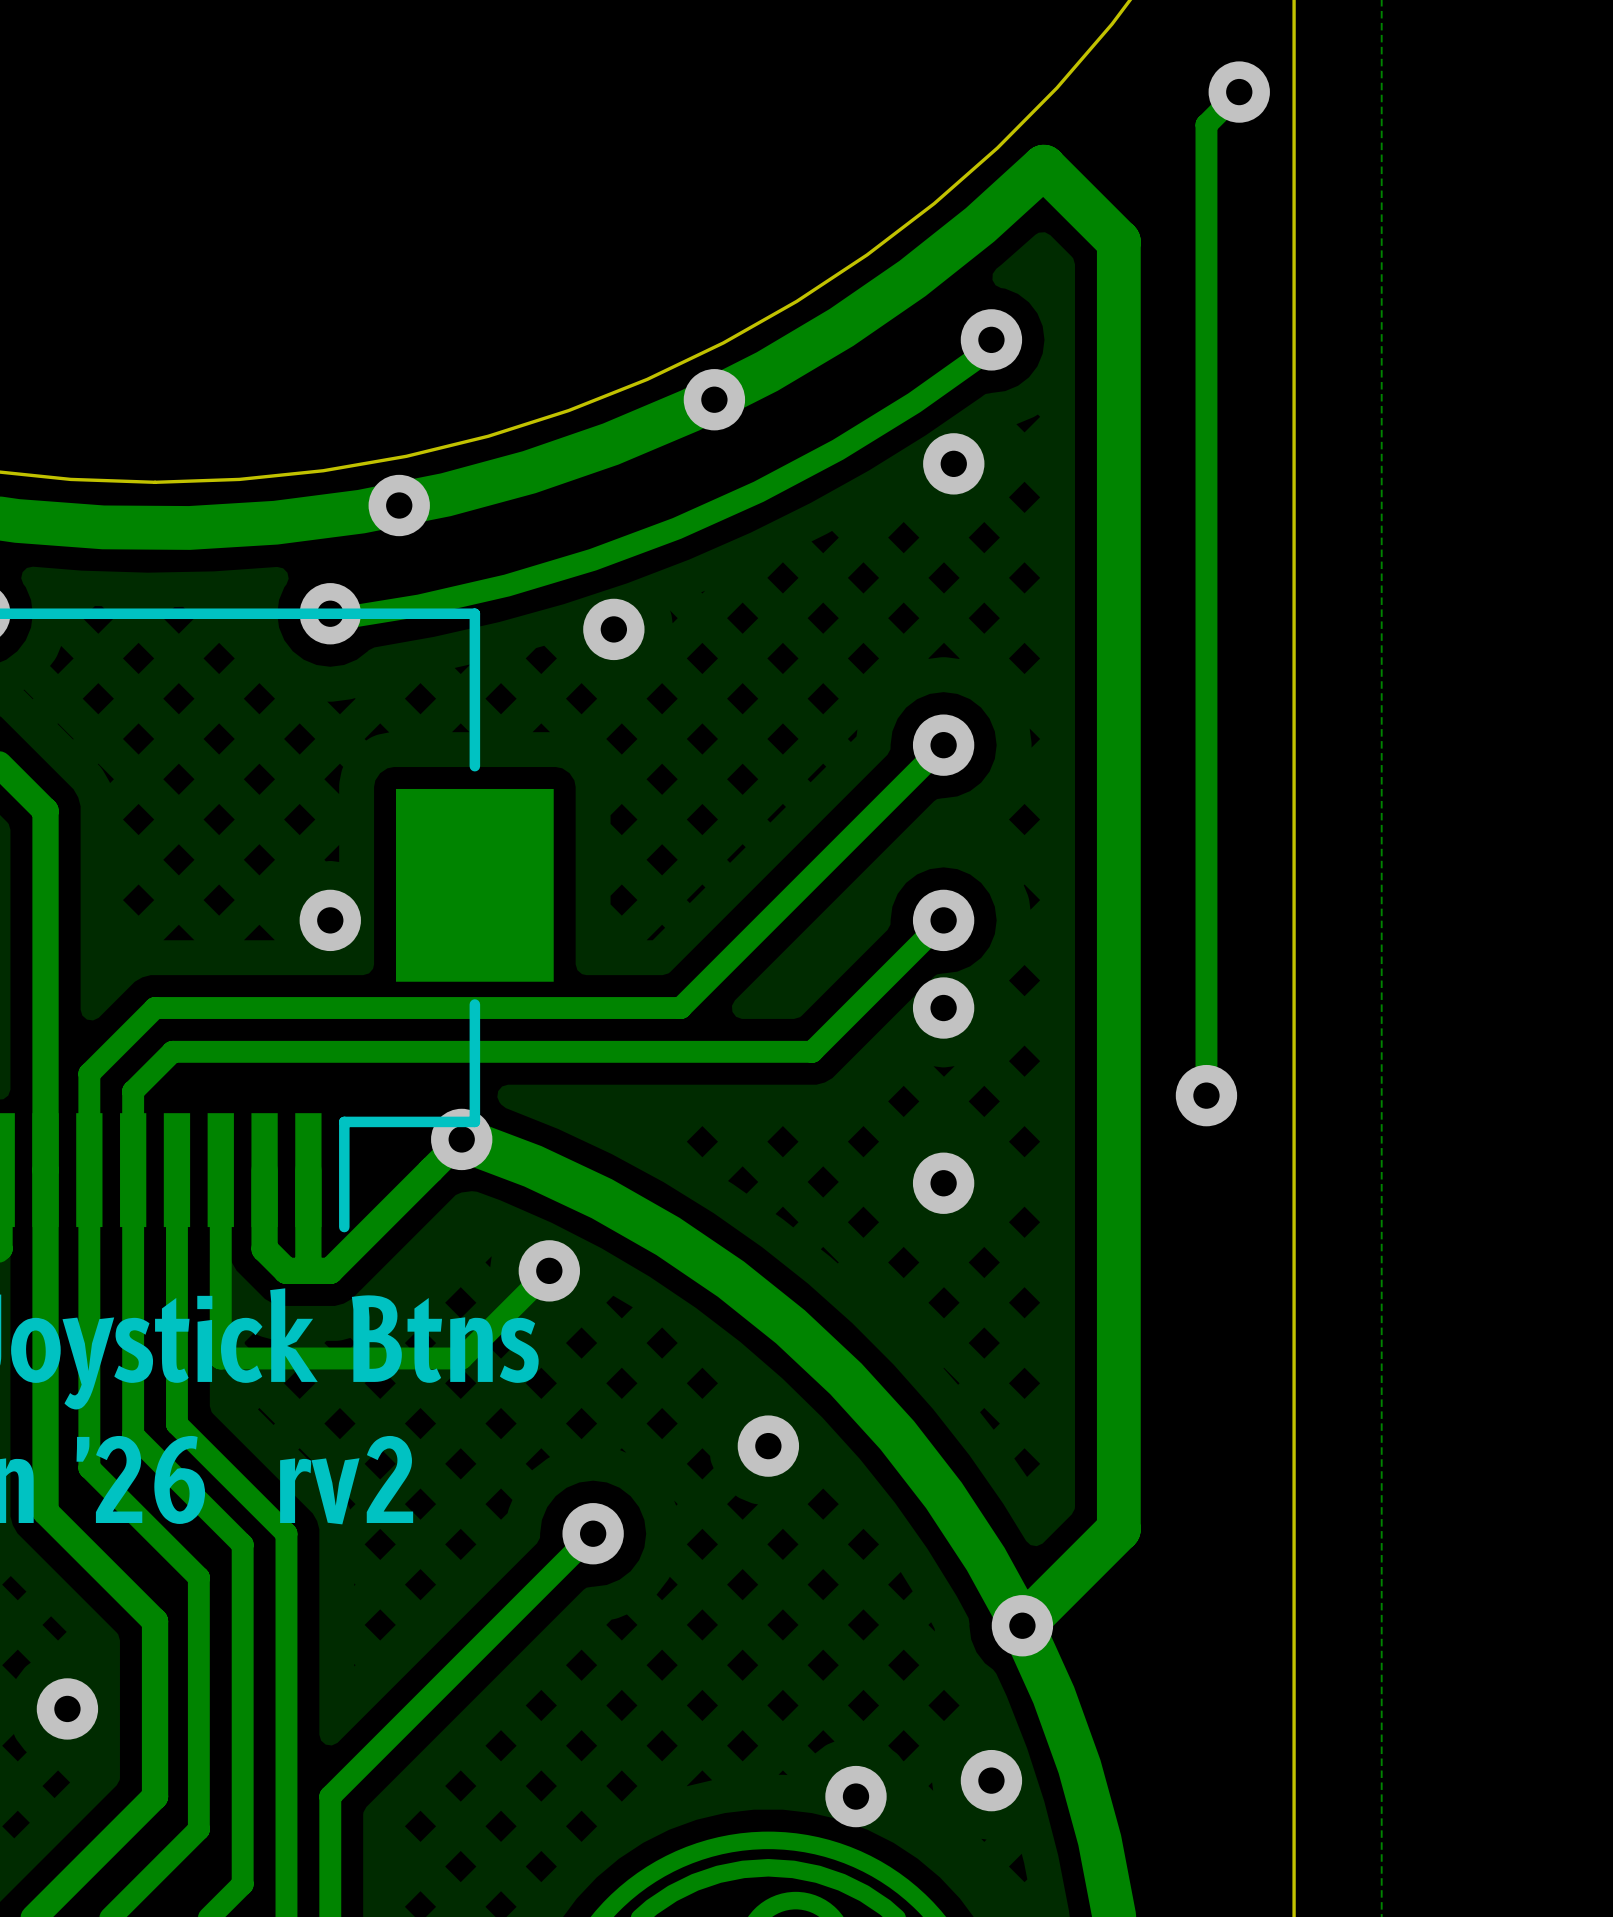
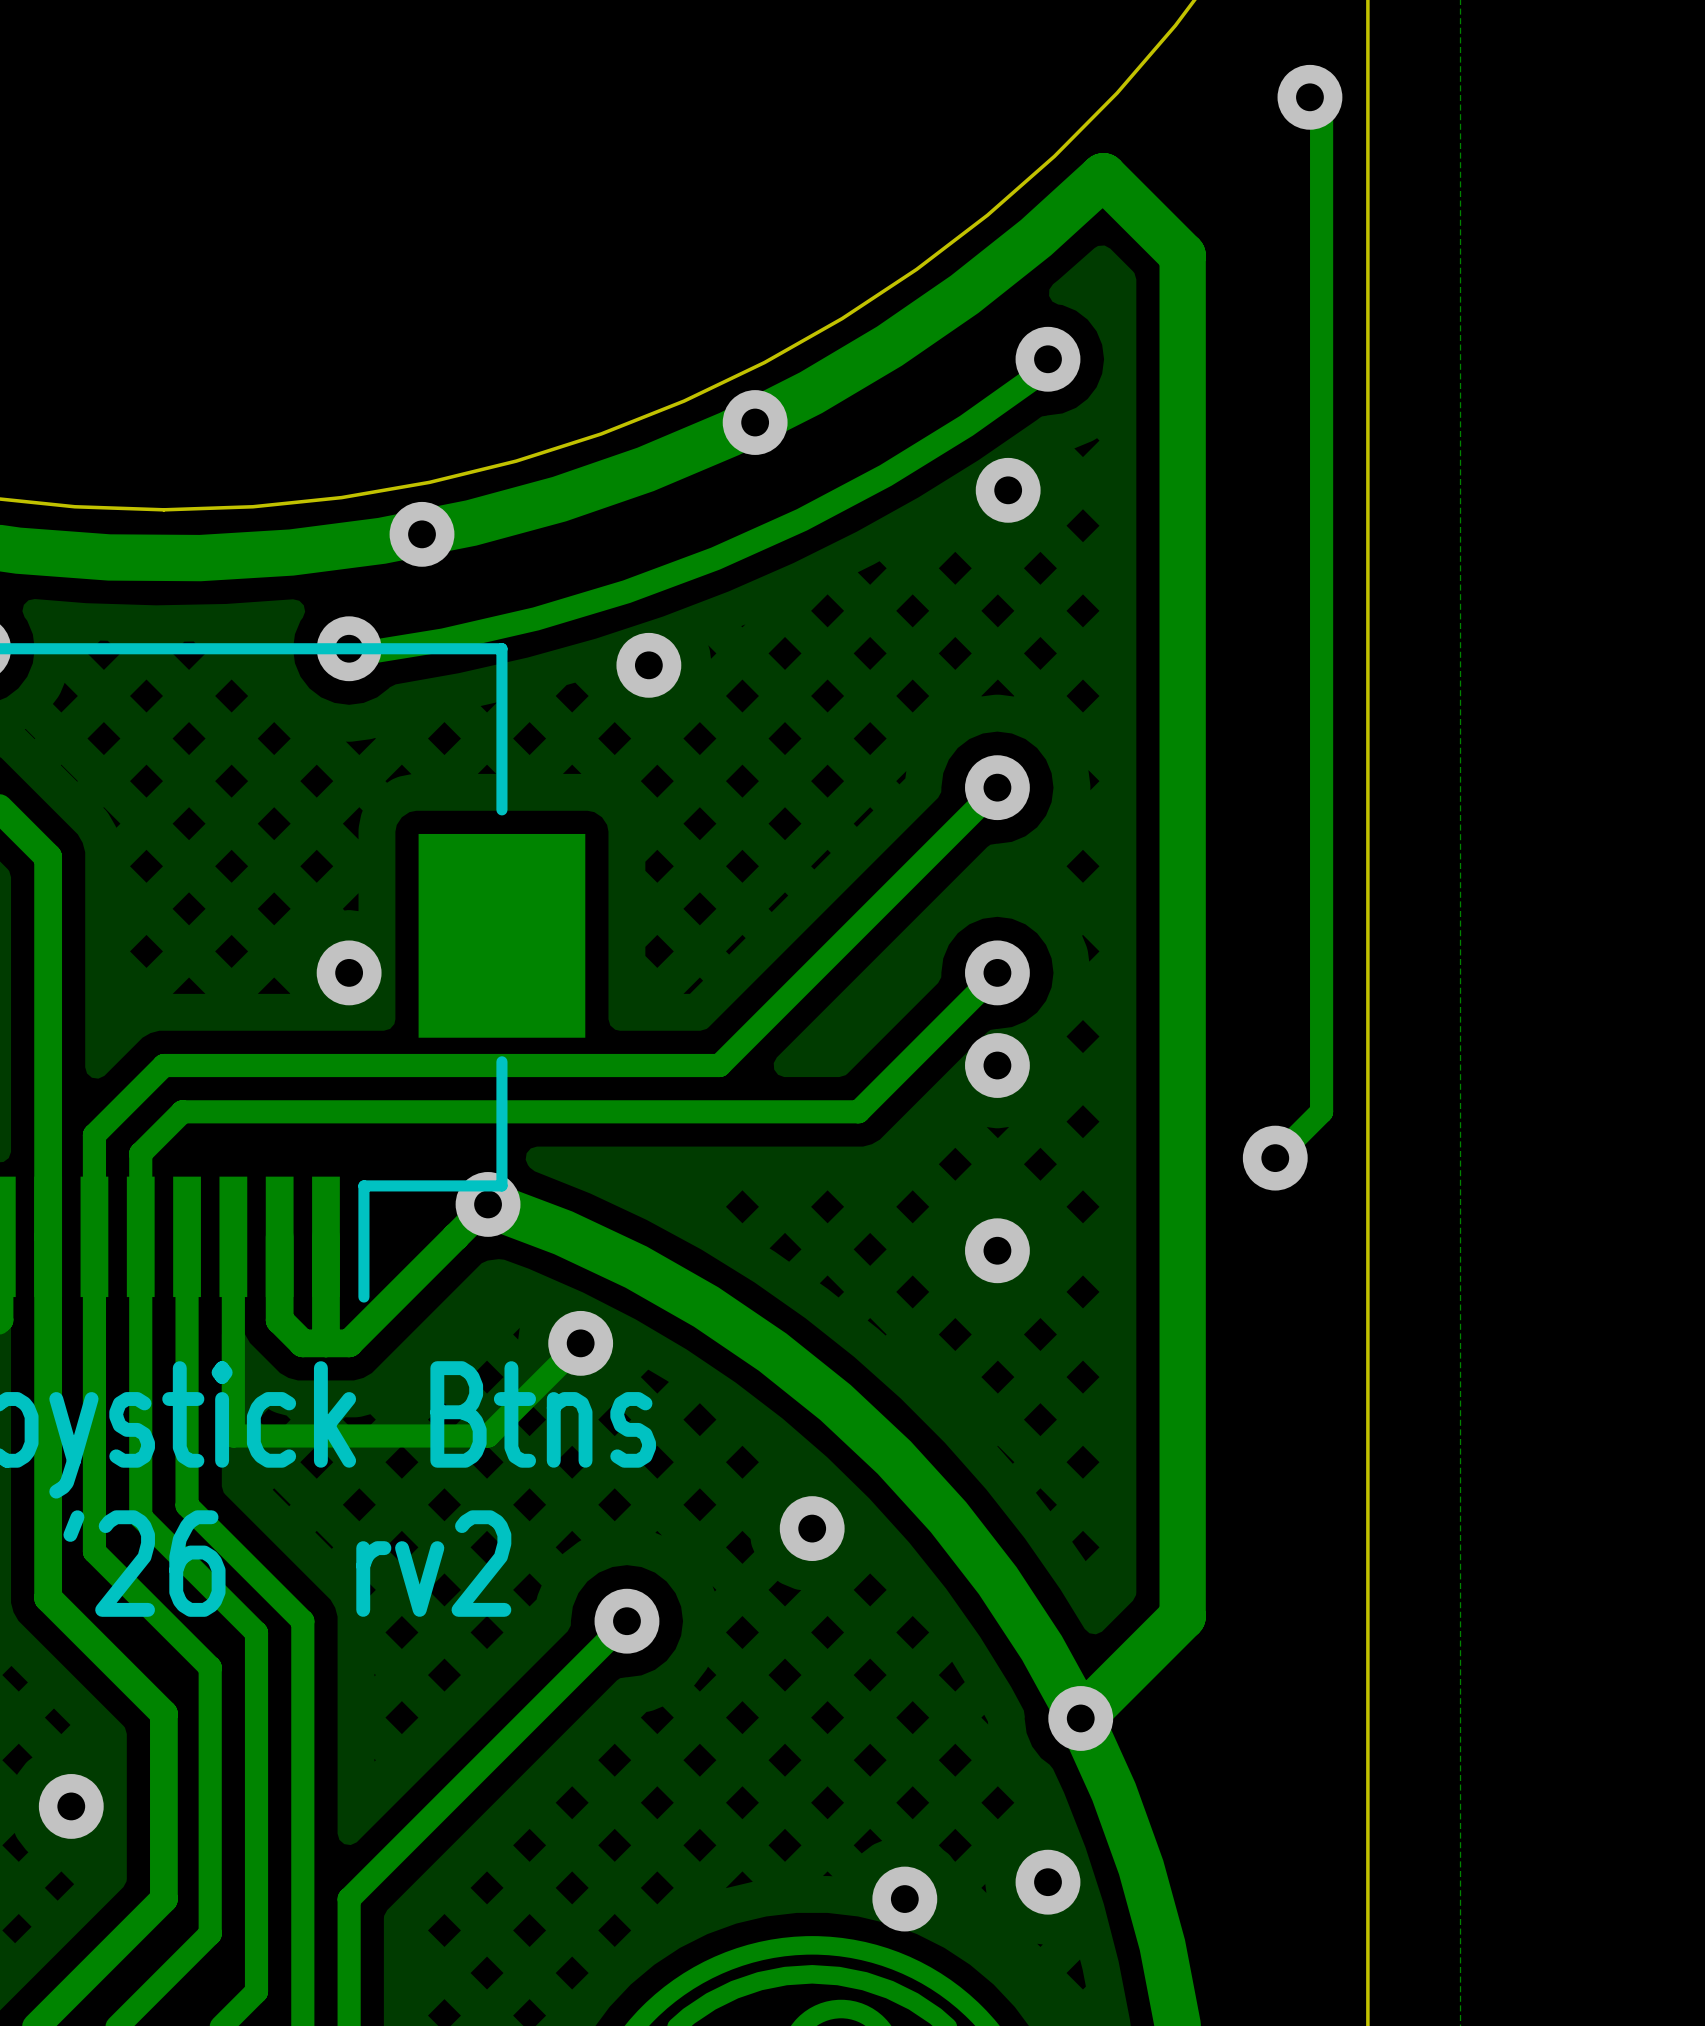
track: (1239, 92) (1206, 124) (1206, 1095) -> (1309, 97) (1321, 108) (1321, 1111) (1275, 1158)

